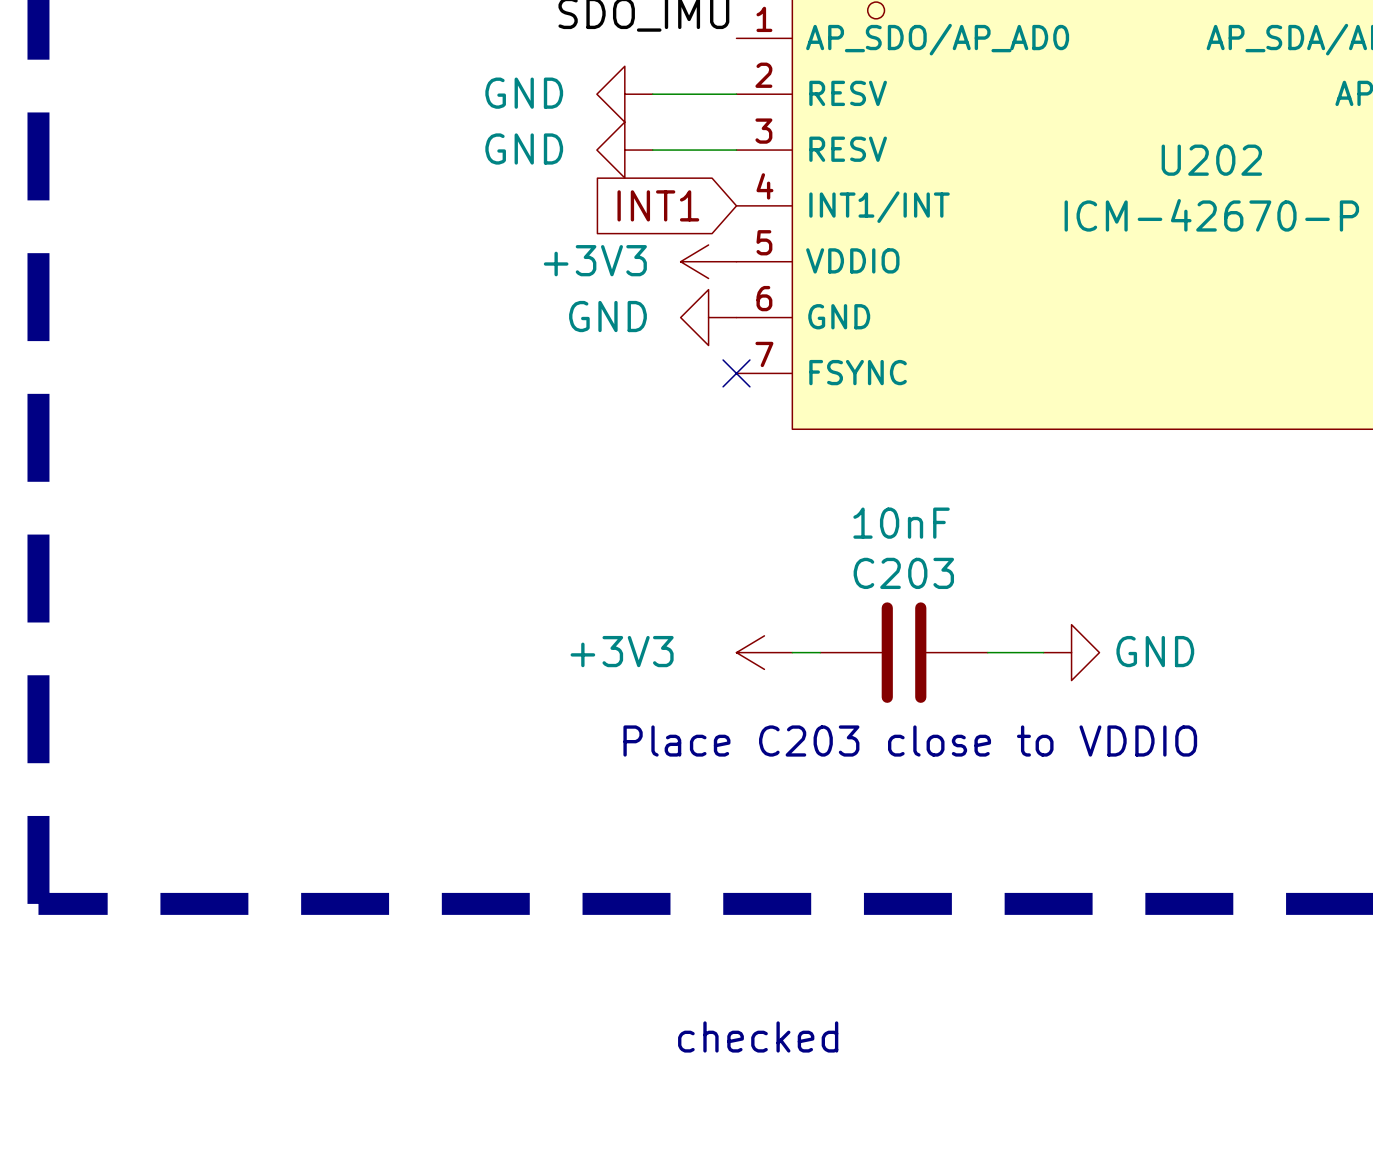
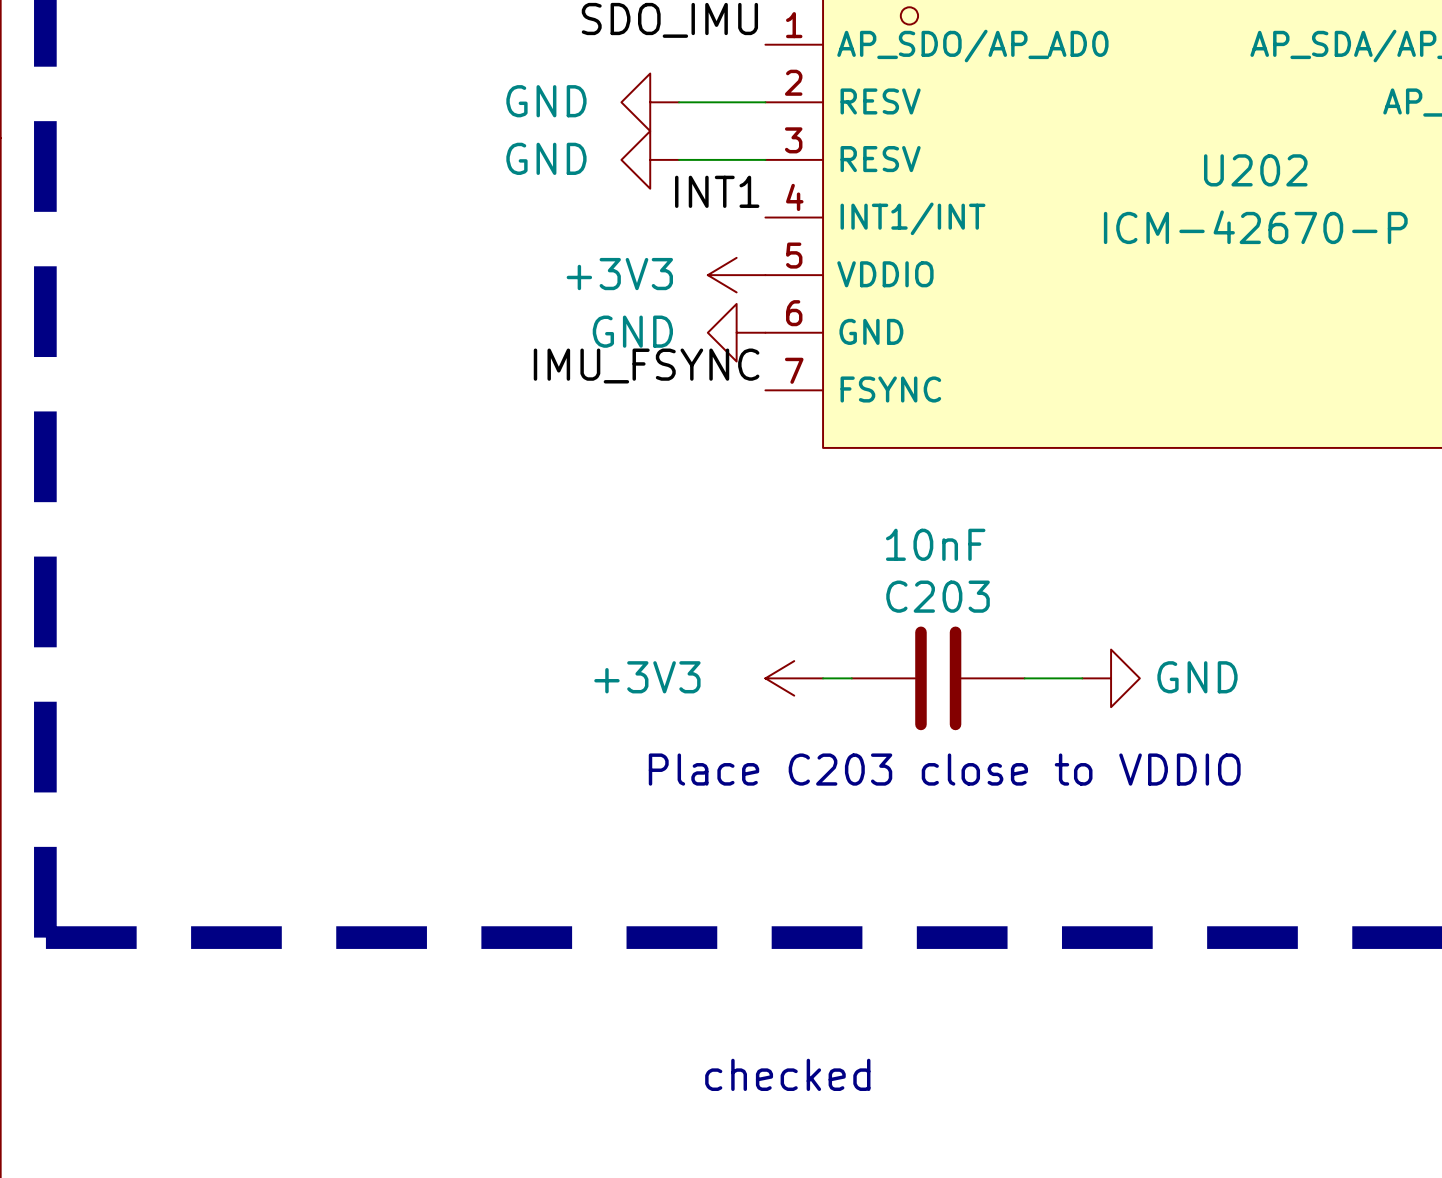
label: none -> INT1 (717, 191)
global label: INT1 (658, 205) -> none
label: none -> IMU_FSYNC (646, 366)
no-connect mark: (736, 373) -> none

